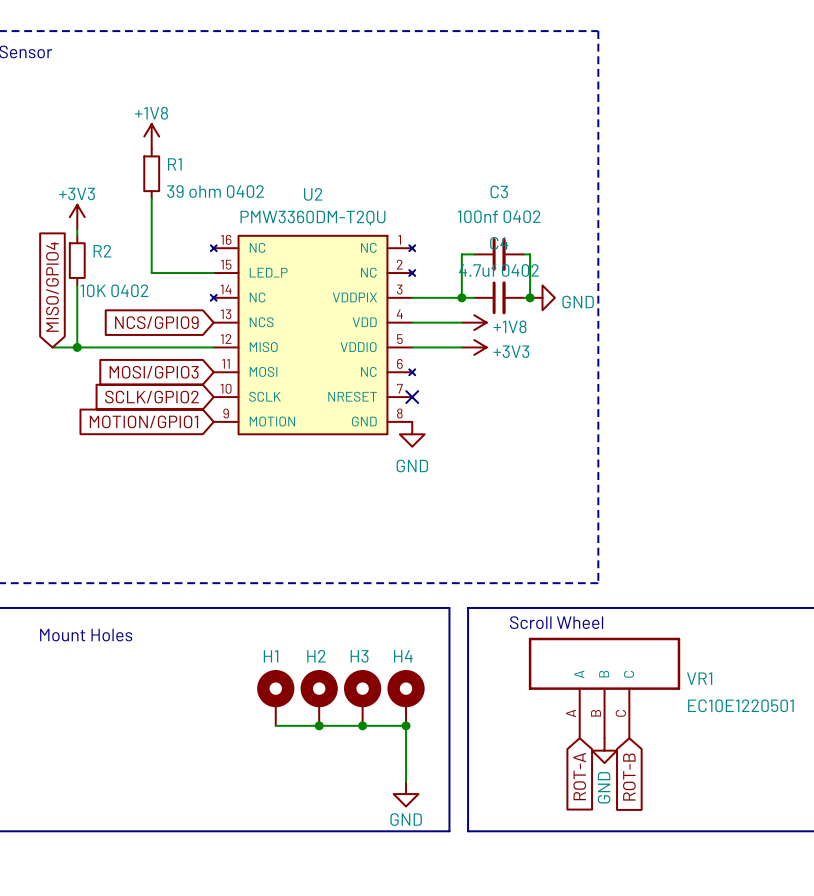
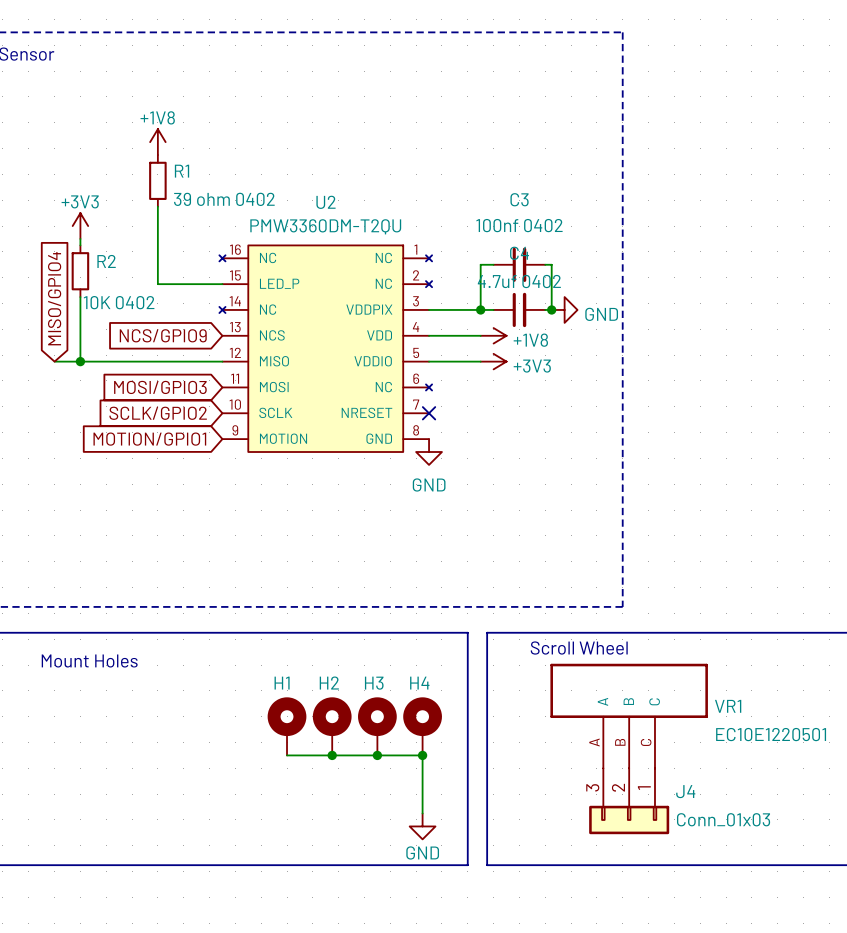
power symbol: GND (604, 750) -> none
J4: none -> Conn_01x03 (629, 801)
global label: ROT-A (579, 776) -> none
global label: ROT-B (629, 777) -> none

